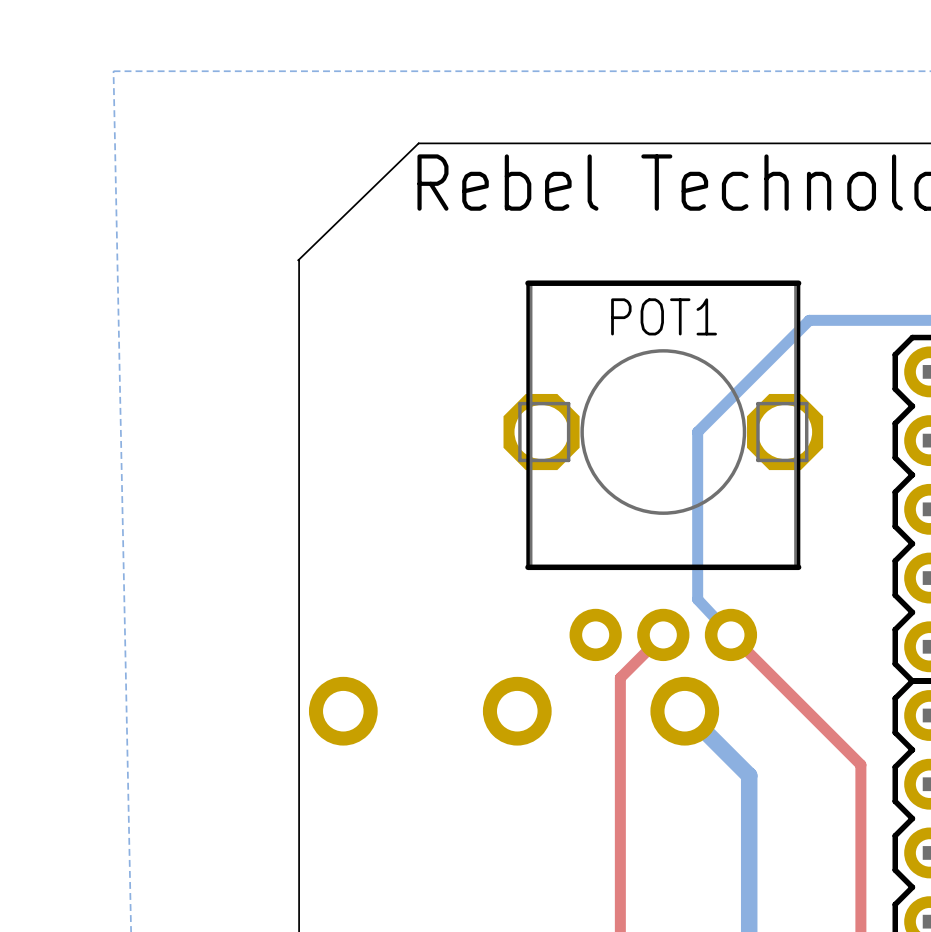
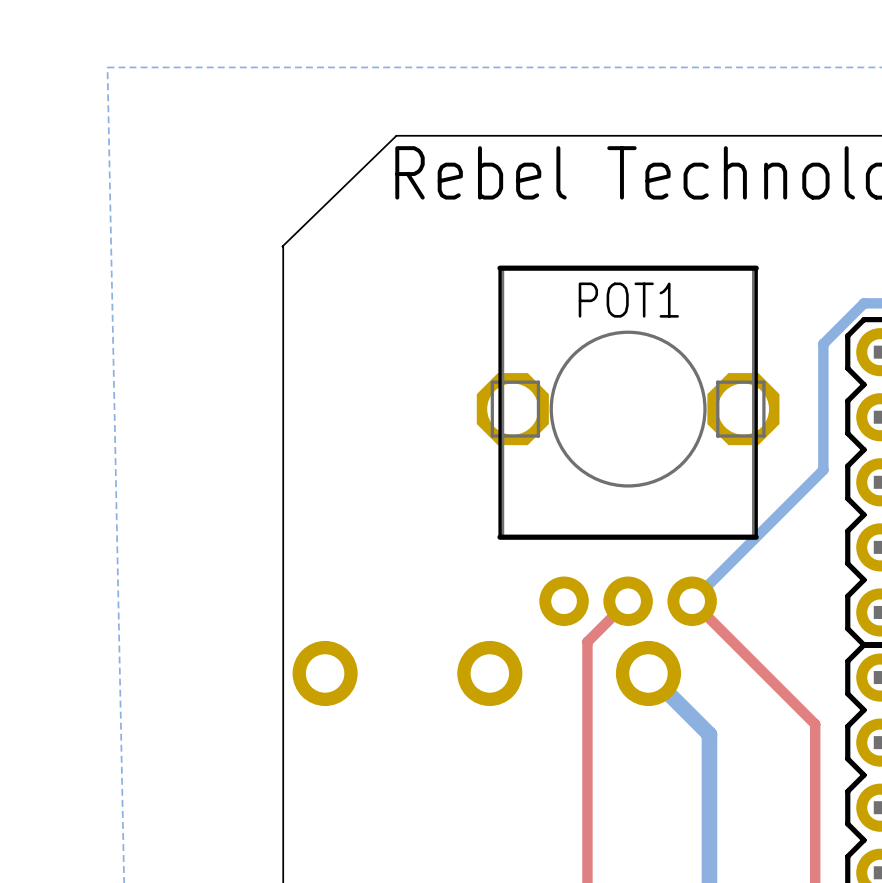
bottom track: (912, 320) (809, 320) (697, 432) (697, 599) (730, 634) -> (864, 303) (823, 344) (823, 470) (692, 601)

